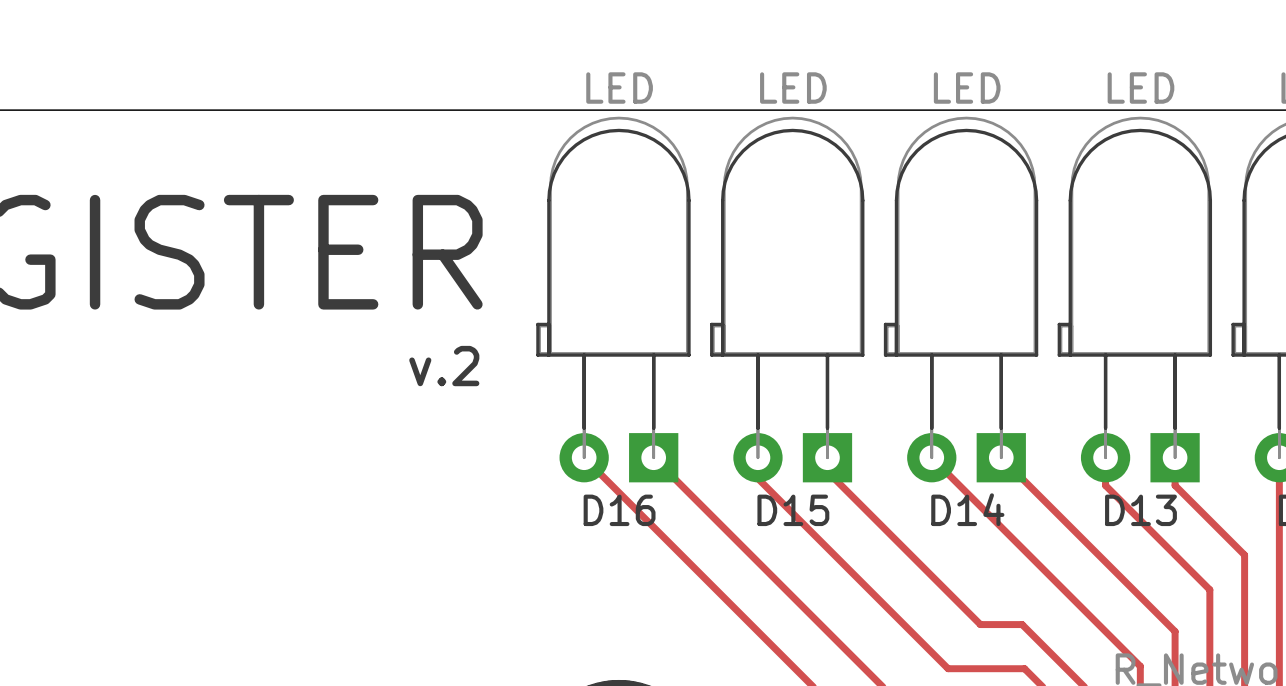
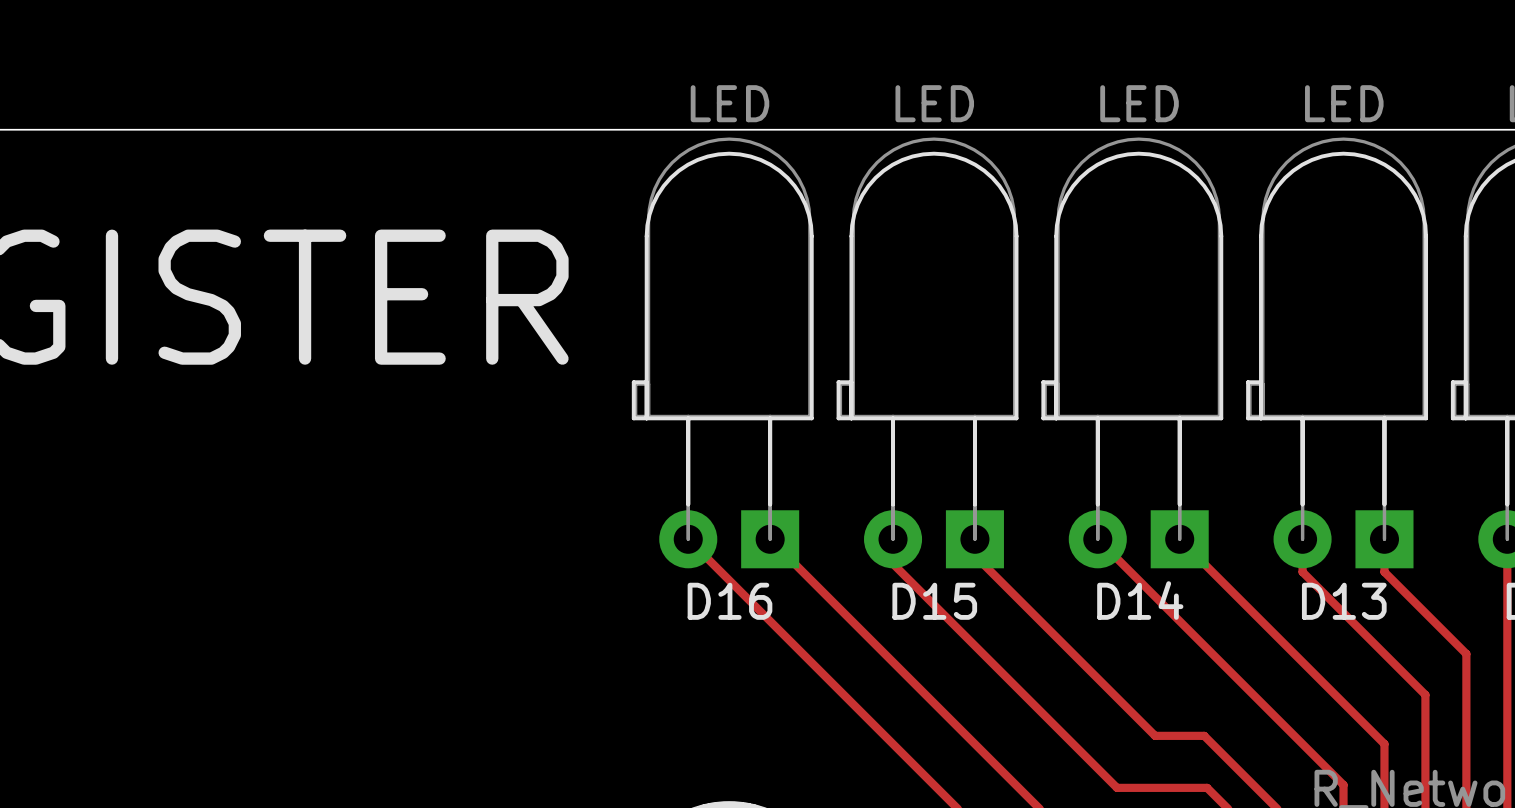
text: v.2 (444, 366) -> none

